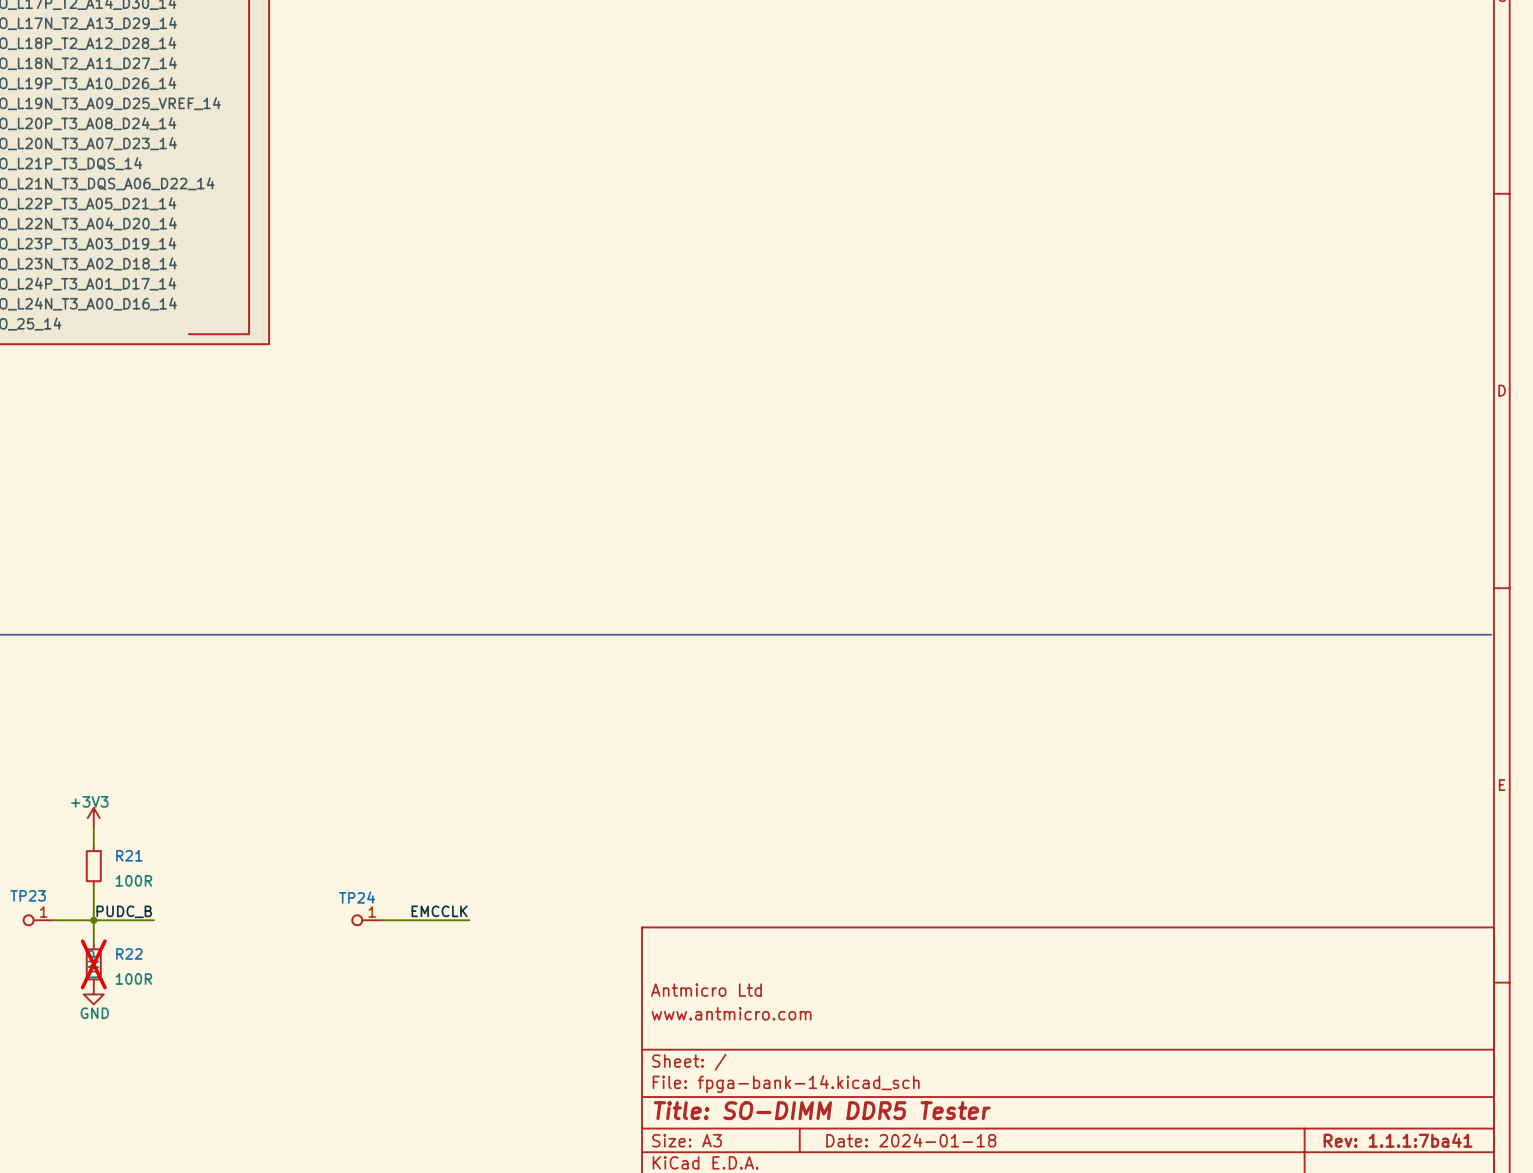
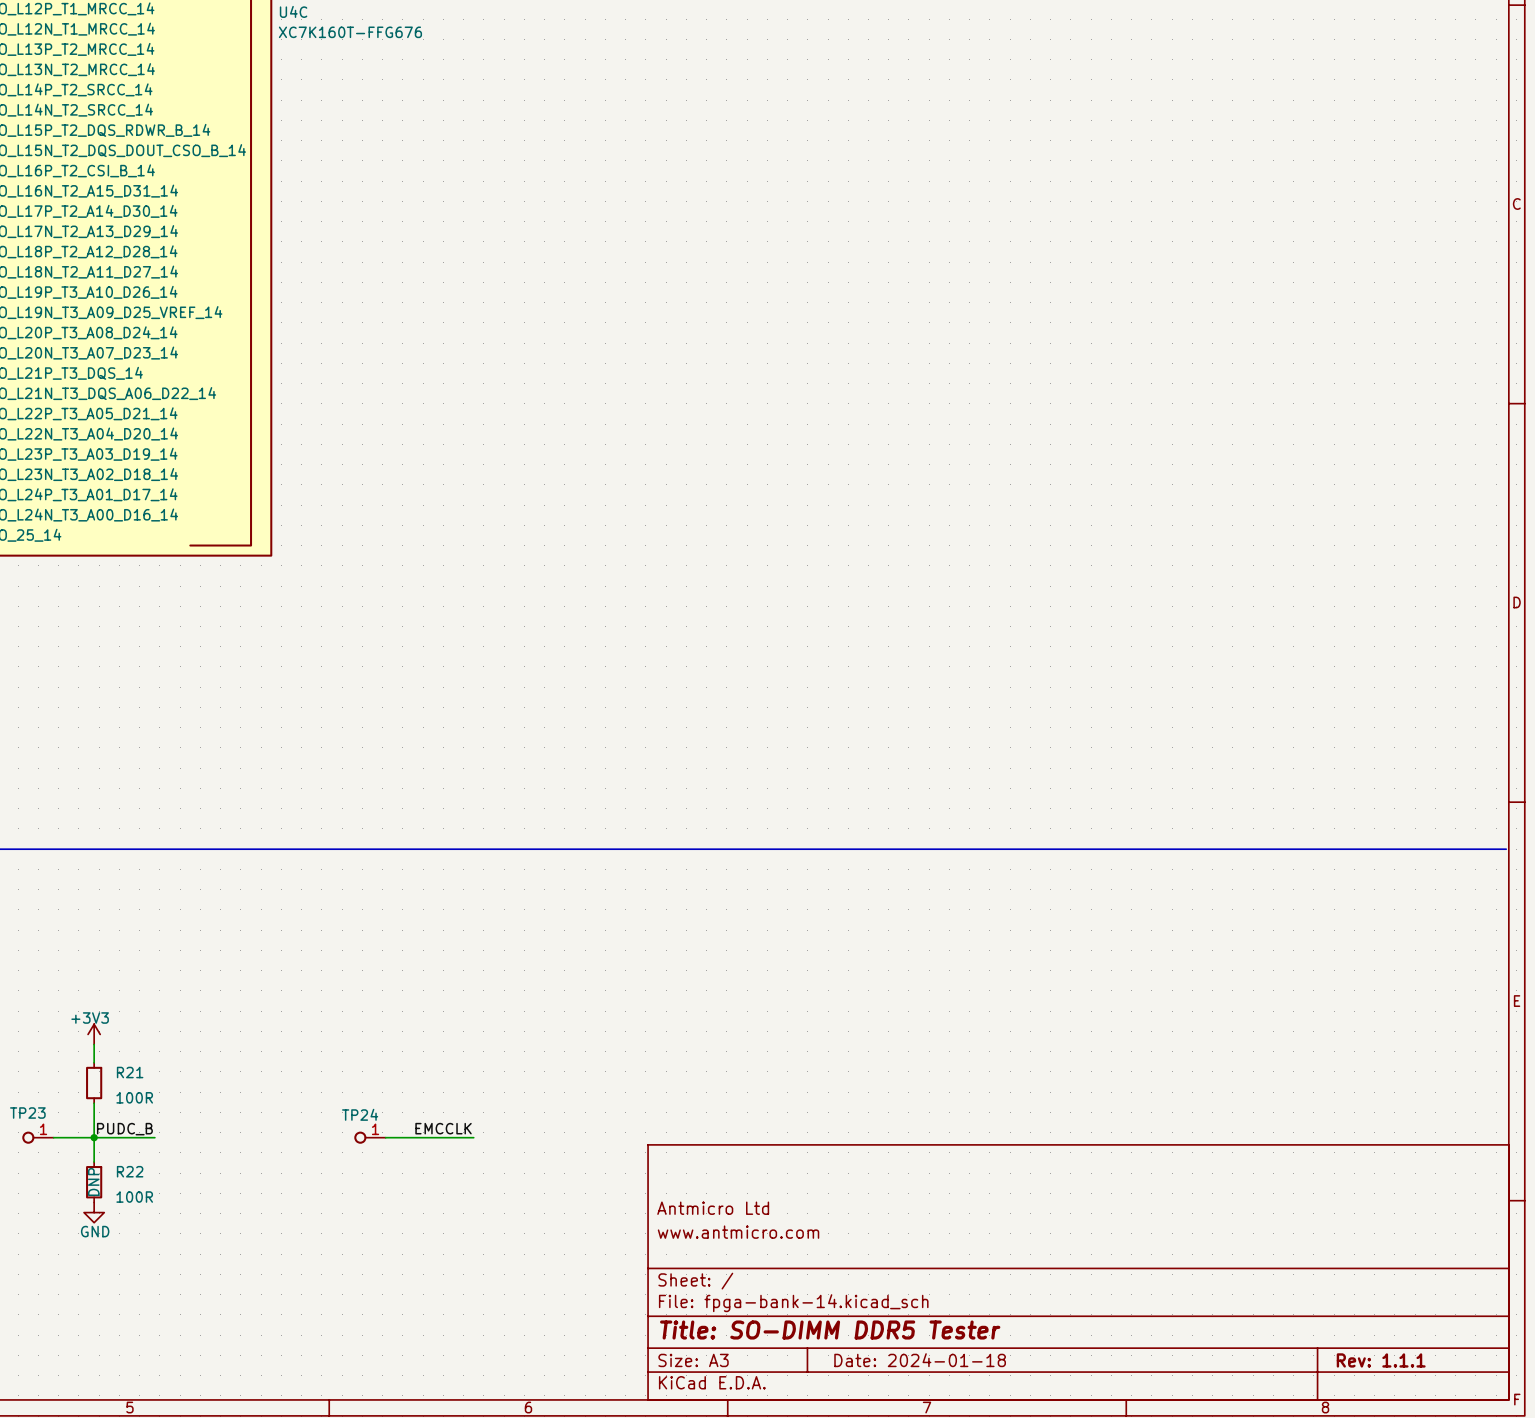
R22 do-not-place cross: (93, 964) -> none
title block: Rev: 1.1.1:7ba41 (1398, 1140) -> Rev: 1.1.1 (1381, 1360)

